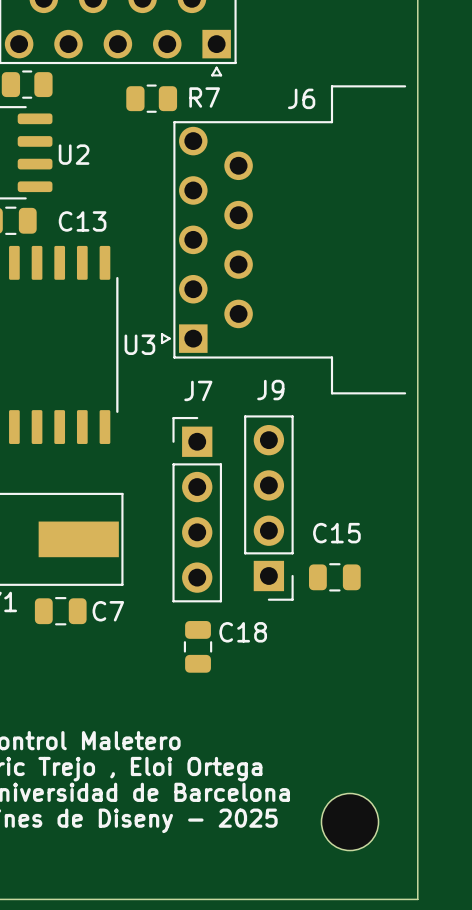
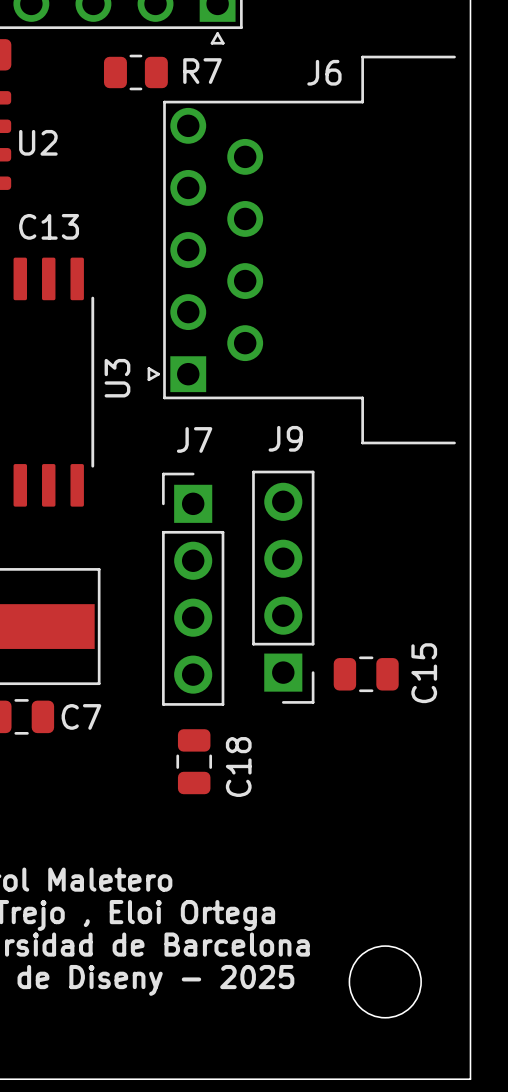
U3 name rotation: 0° (139, 344) -> 90° counterclockwise (117, 378)
C15 name rotation: 0° (336, 533) -> 90° counterclockwise (424, 673)
C18 name rotation: 0° (243, 632) -> 90° counterclockwise (238, 767)

